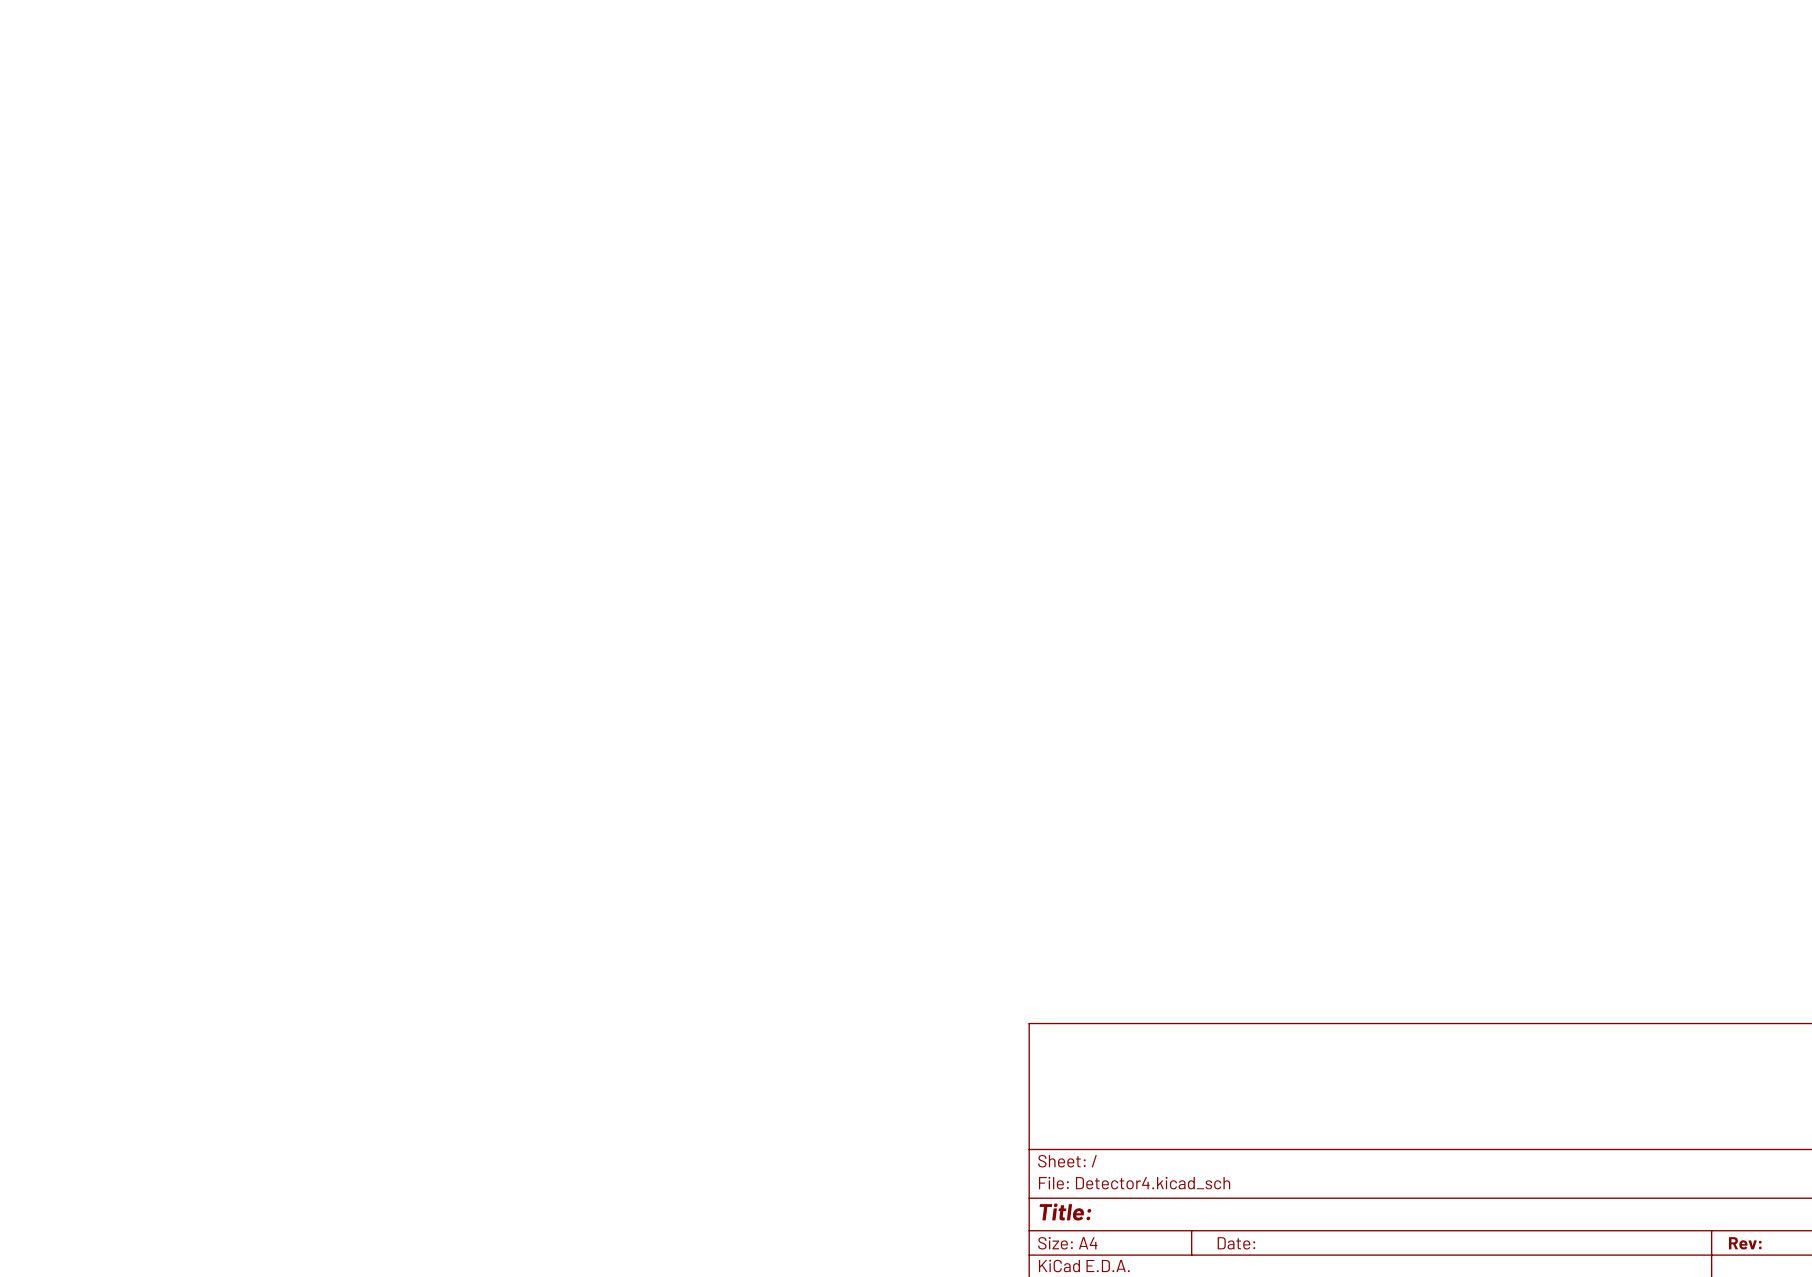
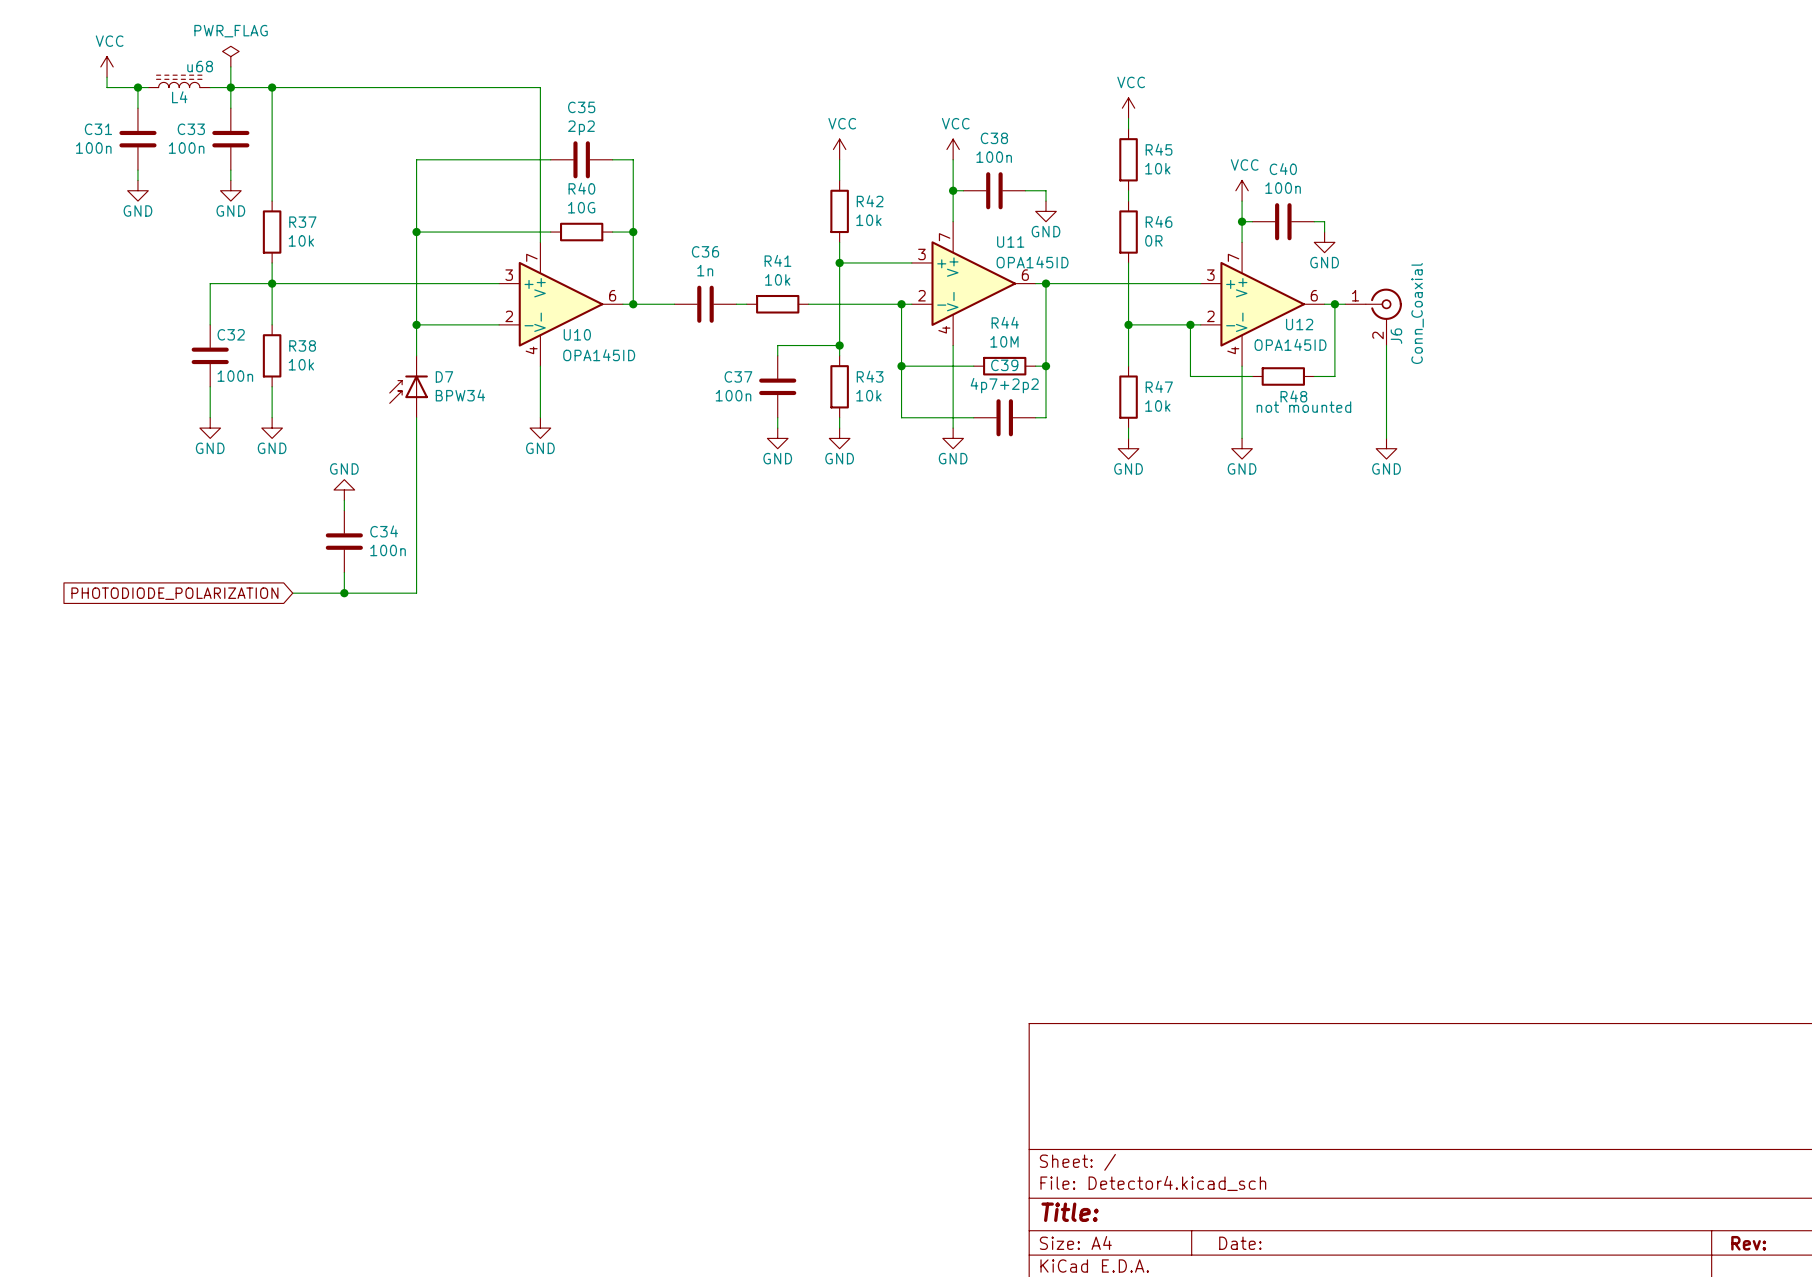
power symbol: none -> PWR_FLAG (230, 56)
power symbol: none -> VCC (107, 66)
wire: none -> (230, 66) (230, 108)
wire: none -> (107, 77) (107, 87) (148, 87)
L4: none -> u68 (179, 81)
wire: none -> (137, 87) (137, 108)
junction: none -> (137, 87)
wire: none -> (210, 87) (540, 87) (540, 242)
junction: none -> (230, 87)
wire: none -> (272, 87) (272, 201)
junction: none -> (272, 87)
power symbol: none -> VCC (1128, 108)
wire: none -> (1128, 118) (1128, 128)
C31: none -> 100n (137, 139)
C33: none -> 100n (230, 139)
power symbol: none -> VCC (839, 149)
power symbol: none -> VCC (953, 149)
wire: none -> (550, 159) (416, 159) (416, 355)
C35: none -> 2p2 (581, 159)
wire: none -> (612, 159) (633, 159) (633, 304)
wire: none -> (839, 159) (839, 180)
wire: none -> (953, 159) (953, 221)
R45: none -> 10k (1128, 159)
wire: none -> (137, 170) (137, 180)
wire: none -> (230, 170) (230, 180)
power symbol: none -> GND (137, 190)
power symbol: none -> GND (230, 190)
wire: none -> (953, 190) (963, 190)
junction: none -> (953, 190)
C38: none -> 100n (994, 190)
wire: none -> (1025, 190) (1046, 190) (1046, 201)
wire: none -> (1128, 190) (1128, 201)
power symbol: none -> VCC (1242, 190)
wire: none -> (1242, 201) (1242, 242)
R42: none -> 10k (839, 211)
power symbol: none -> GND (1046, 211)
wire: none -> (1242, 221) (1252, 221)
junction: none -> (1242, 221)
C40: none -> 100n (1283, 221)
wire: none -> (1314, 221) (1324, 221) (1324, 232)
R37: none -> 10k (272, 232)
wire: none -> (416, 232) (550, 232)
junction: none -> (416, 232)
R40: none -> 10G (581, 232)
wire: none -> (612, 232) (633, 232)
junction: none -> (633, 232)
R46: none -> 0R (1128, 232)
wire: none -> (839, 242) (839, 355)
power symbol: none -> GND (1324, 242)
wire: none -> (272, 262) (272, 324)
wire: none -> (839, 262) (911, 262)
junction: none -> (839, 262)
wire: none -> (1128, 262) (1128, 366)
junction: none -> (272, 283)
wire: none -> (499, 283) (210, 283) (210, 324)
U11: none -> OPA145ID (973, 283)
wire: none -> (1035, 283) (1200, 283)
wire: none -> (1046, 283) (1046, 417) (1035, 417)
junction: none -> (1046, 283)
U10: none -> OPA145ID (561, 304)
wire: none -> (622, 304) (674, 304)
junction: none -> (633, 304)
C36: none -> 1n (705, 304)
wire: none -> (736, 304) (746, 304)
R41: none -> 10k (777, 304)
wire: none -> (808, 304) (911, 304)
wire: none -> (901, 304) (901, 417) (973, 417)
junction: none -> (901, 304)
U12: none -> OPA145ID (1262, 304)
wire: none -> (1324, 304) (1345, 304)
wire: none -> (1334, 304) (1334, 376) (1314, 376)
junction: none -> (1334, 304)
J6: none -> Conn_Coaxial (1373, 317)
wire: none -> (416, 324) (499, 324)
junction: none -> (416, 324)
wire: none -> (1128, 324) (1200, 324)
junction: none -> (1128, 324)
wire: none -> (1190, 324) (1190, 376) (1252, 376)
junction: none -> (1190, 324)
wire: none -> (839, 345) (777, 345) (777, 355)
junction: none -> (839, 345)
wire: none -> (953, 345) (953, 428)
wire: none -> (1386, 345) (1386, 438)
C32: none -> 100n (210, 355)
R38: none -> 10k (272, 355)
wire: none -> (540, 366) (540, 417)
wire: none -> (901, 366) (973, 366)
junction: none -> (901, 366)
R44: none -> 10M (1004, 366)
wire: none -> (1035, 366) (1046, 366)
junction: none -> (1046, 366)
wire: none -> (1242, 366) (1242, 438)
R48: none -> not mounted (1283, 376)
wire: none -> (210, 386) (210, 417)
wire: none -> (272, 386) (272, 417)
D7: none -> BPW34 (408, 386)
C37: none -> 100n (777, 386)
R43: none -> 10k (839, 386)
R47: none -> 10k (1128, 397)
wire: none -> (416, 417) (416, 593) (292, 593)
wire: none -> (777, 417) (777, 428)
wire: none -> (839, 417) (839, 428)
C39: none -> 4p7+2p2 (1004, 417)
power symbol: none -> GND (210, 428)
power symbol: none -> GND (272, 428)
power symbol: none -> GND (540, 428)
wire: none -> (1128, 428) (1128, 438)
power symbol: none -> GND (777, 438)
power symbol: none -> GND (839, 438)
power symbol: none -> GND (953, 438)
power symbol: none -> GND (1128, 448)
power symbol: none -> GND (1242, 448)
power symbol: none -> GND (1386, 448)
power symbol: none -> GND (344, 489)
wire: none -> (344, 500) (344, 510)
C34: none -> 100n (344, 541)
wire: none -> (344, 572) (344, 593)
global label: none -> PHOTODIODE_POLARIZATION (174, 593)
junction: none -> (344, 593)

